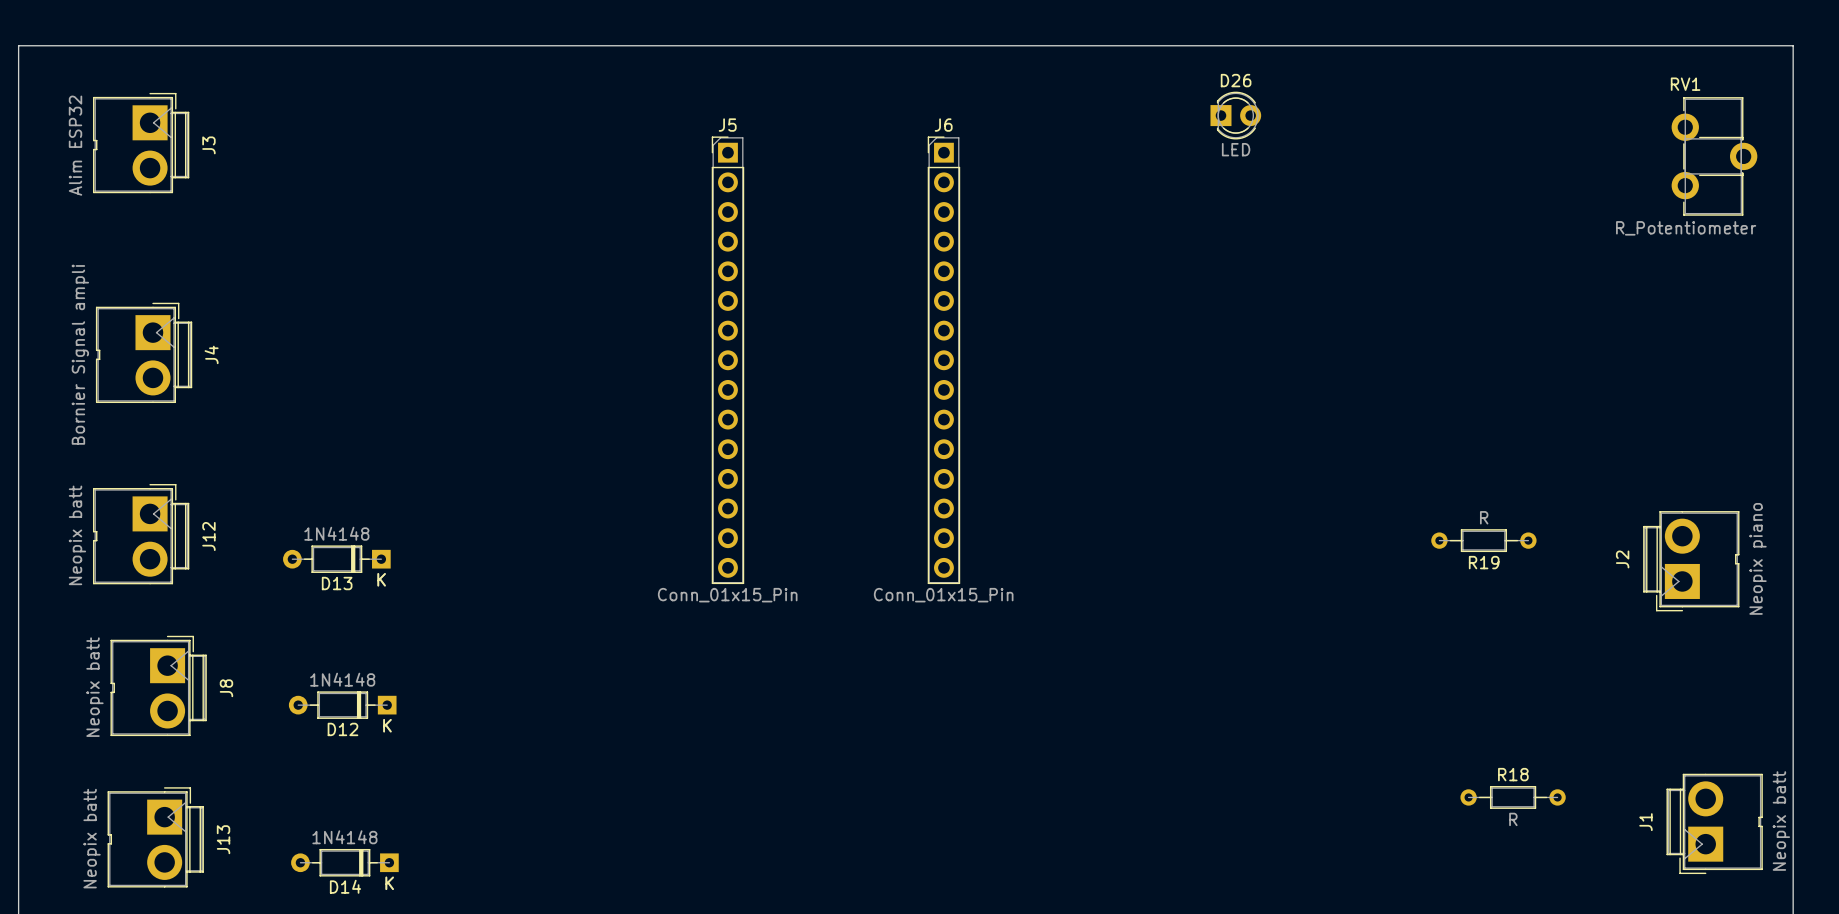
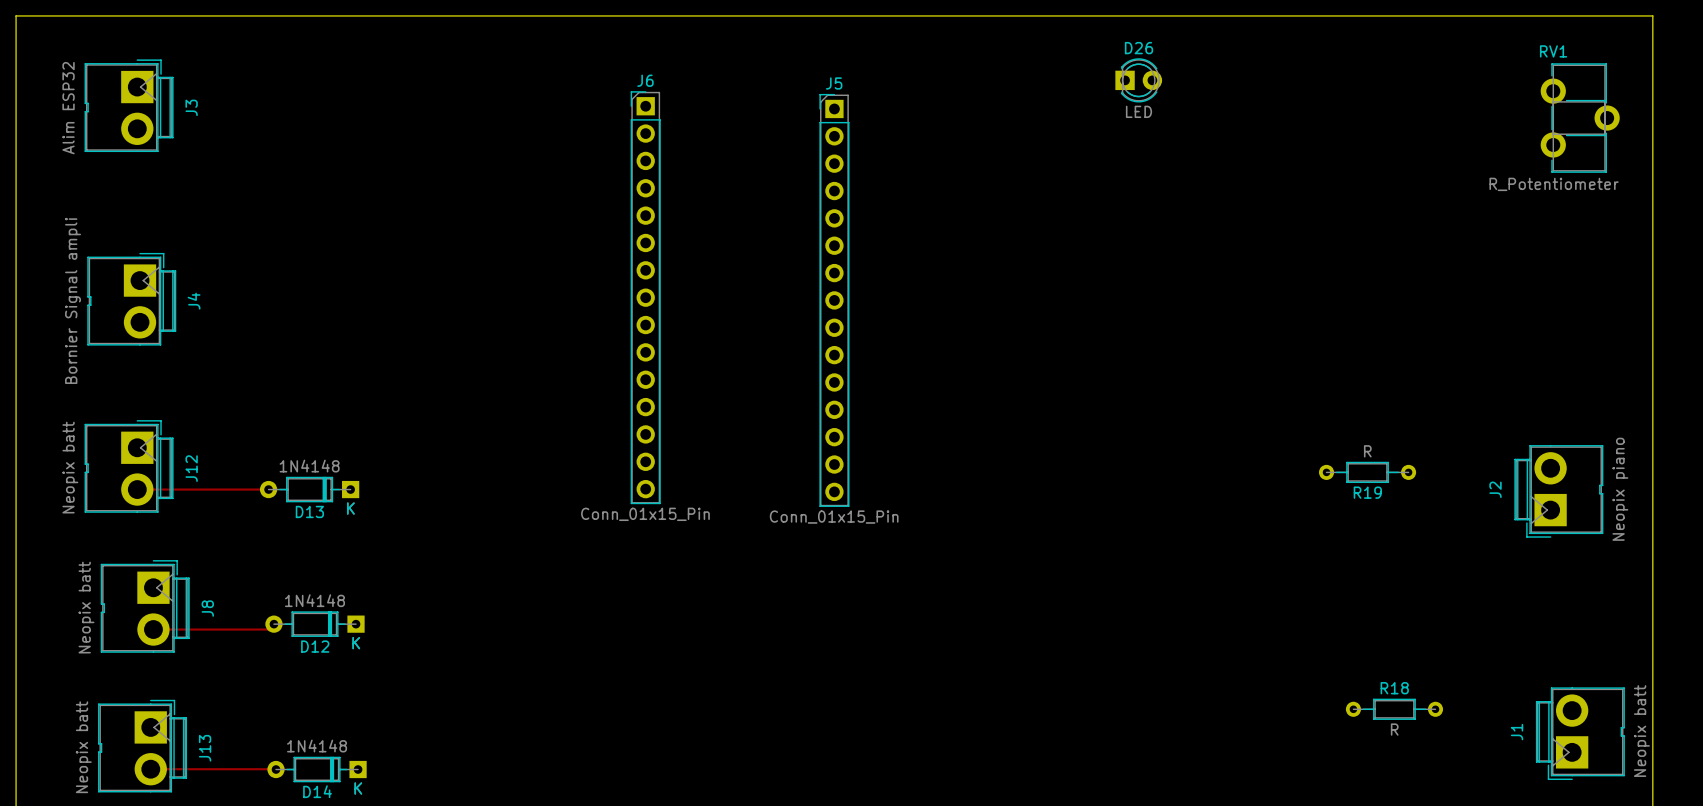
J5 position: (727, 360) -> (834, 300)
J6 position: (943, 360) -> (645, 297)
top track: none -> (137, 489) (268, 489)
top track: none -> (153, 629) (273, 629)
top track: none -> (150, 769) (276, 769)

